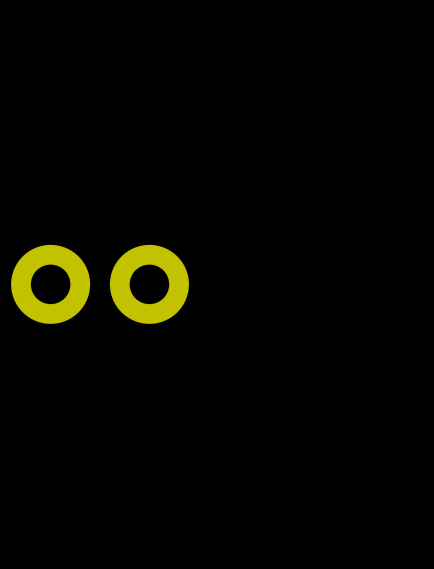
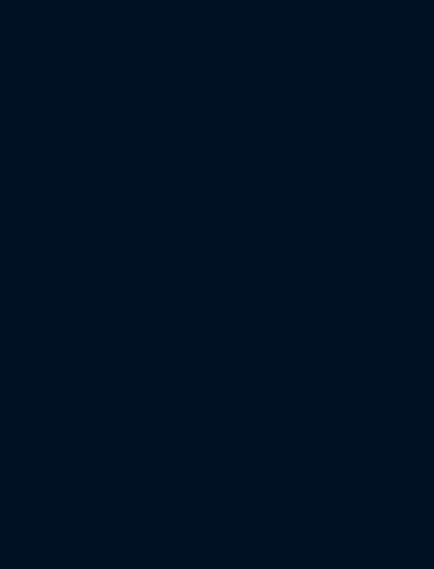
part: (100, 284) -> none

